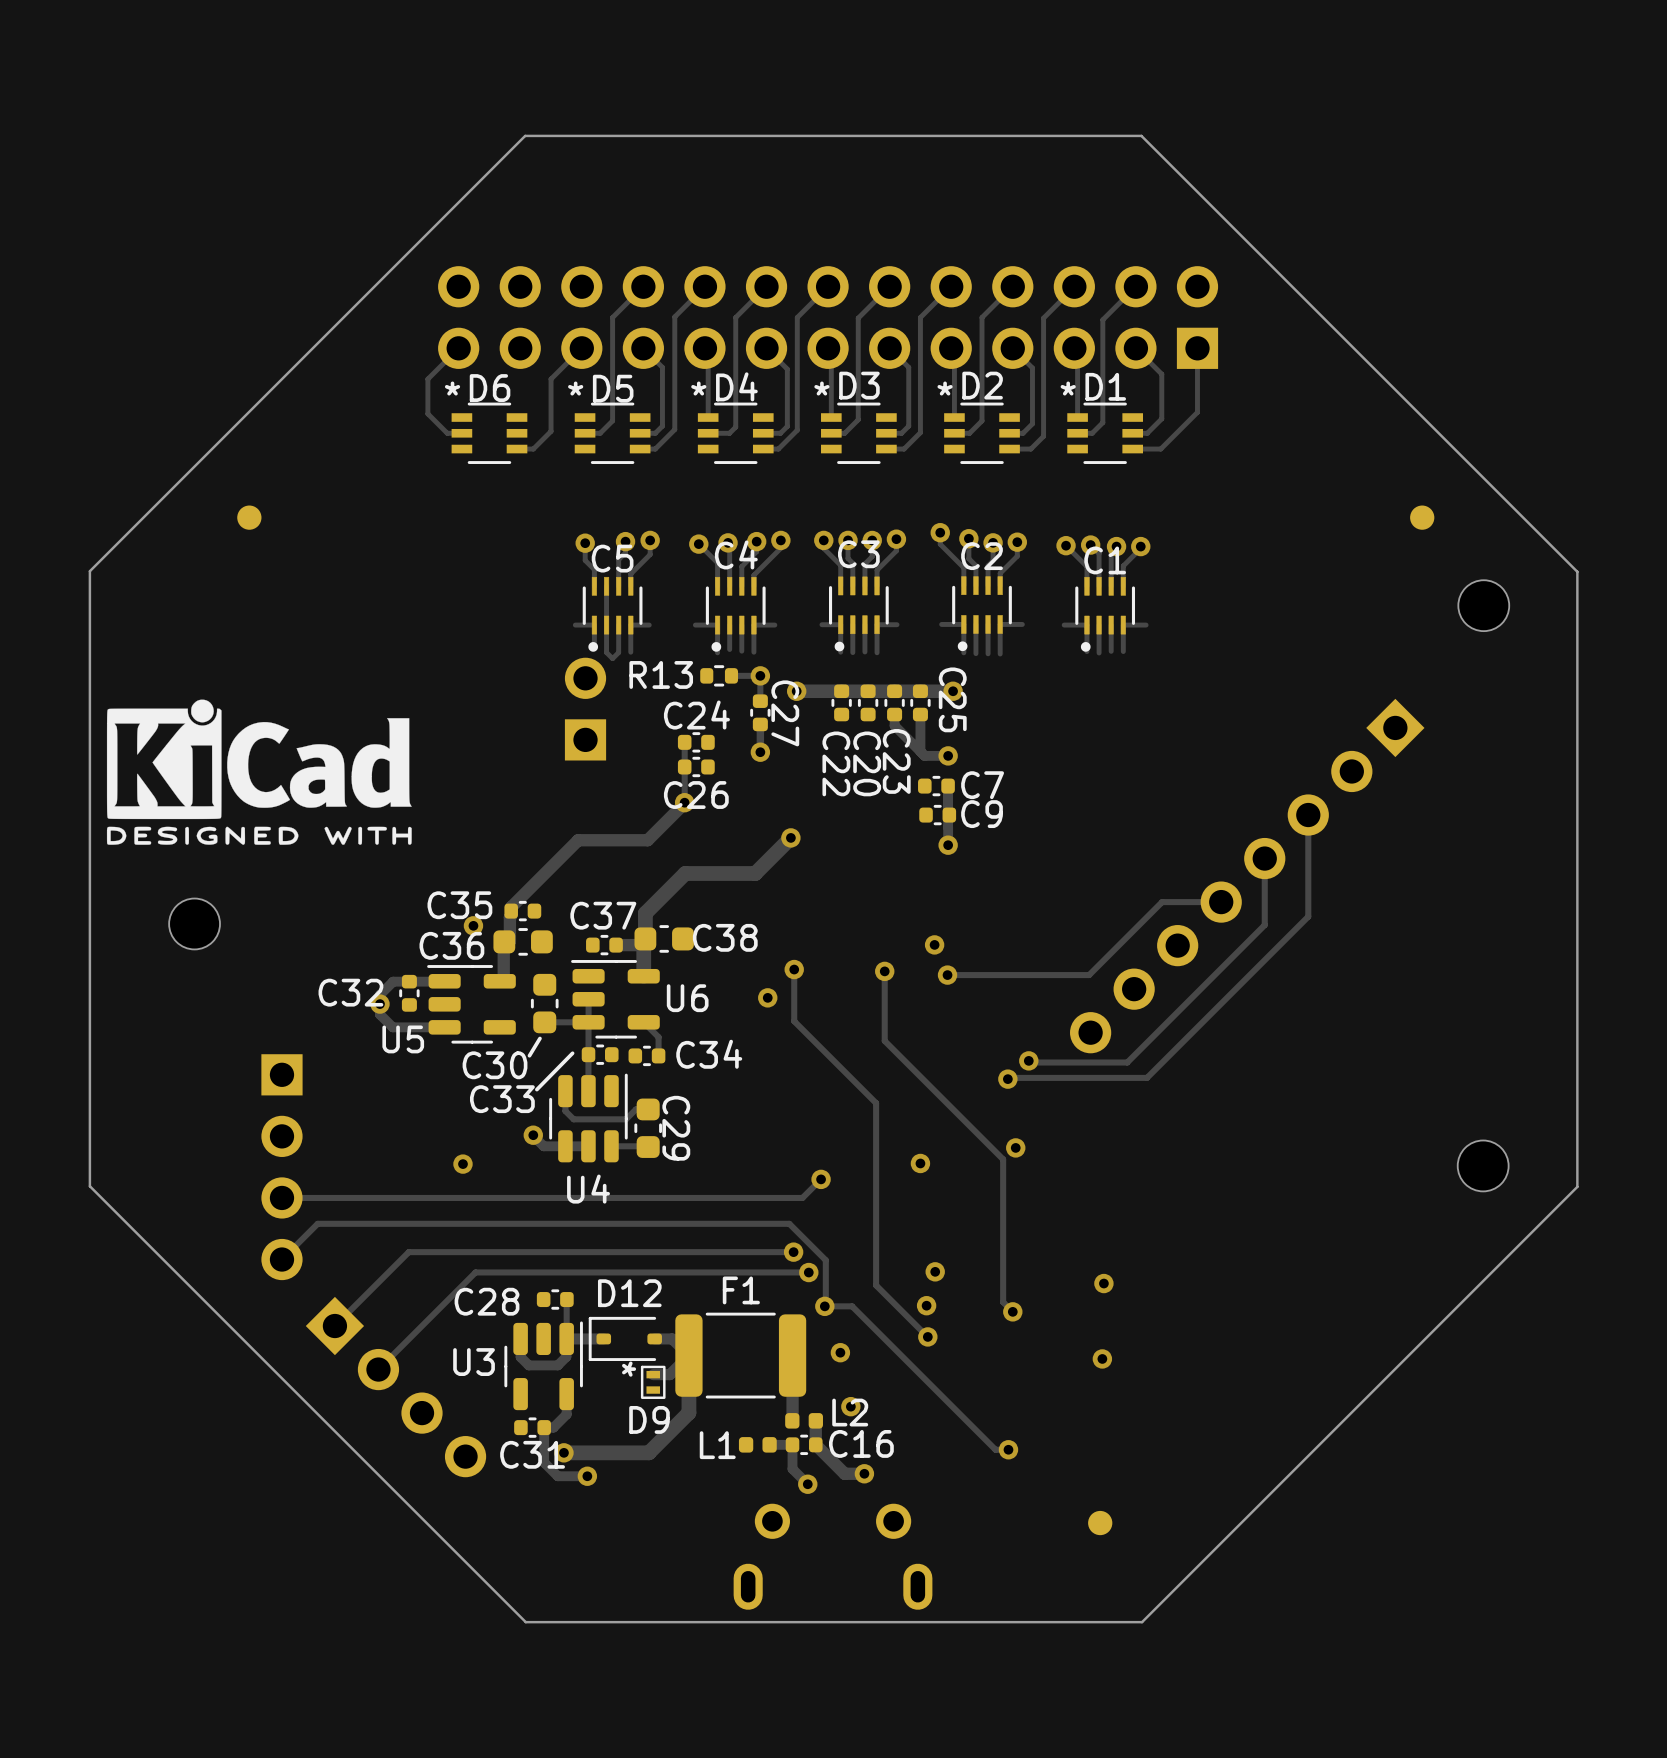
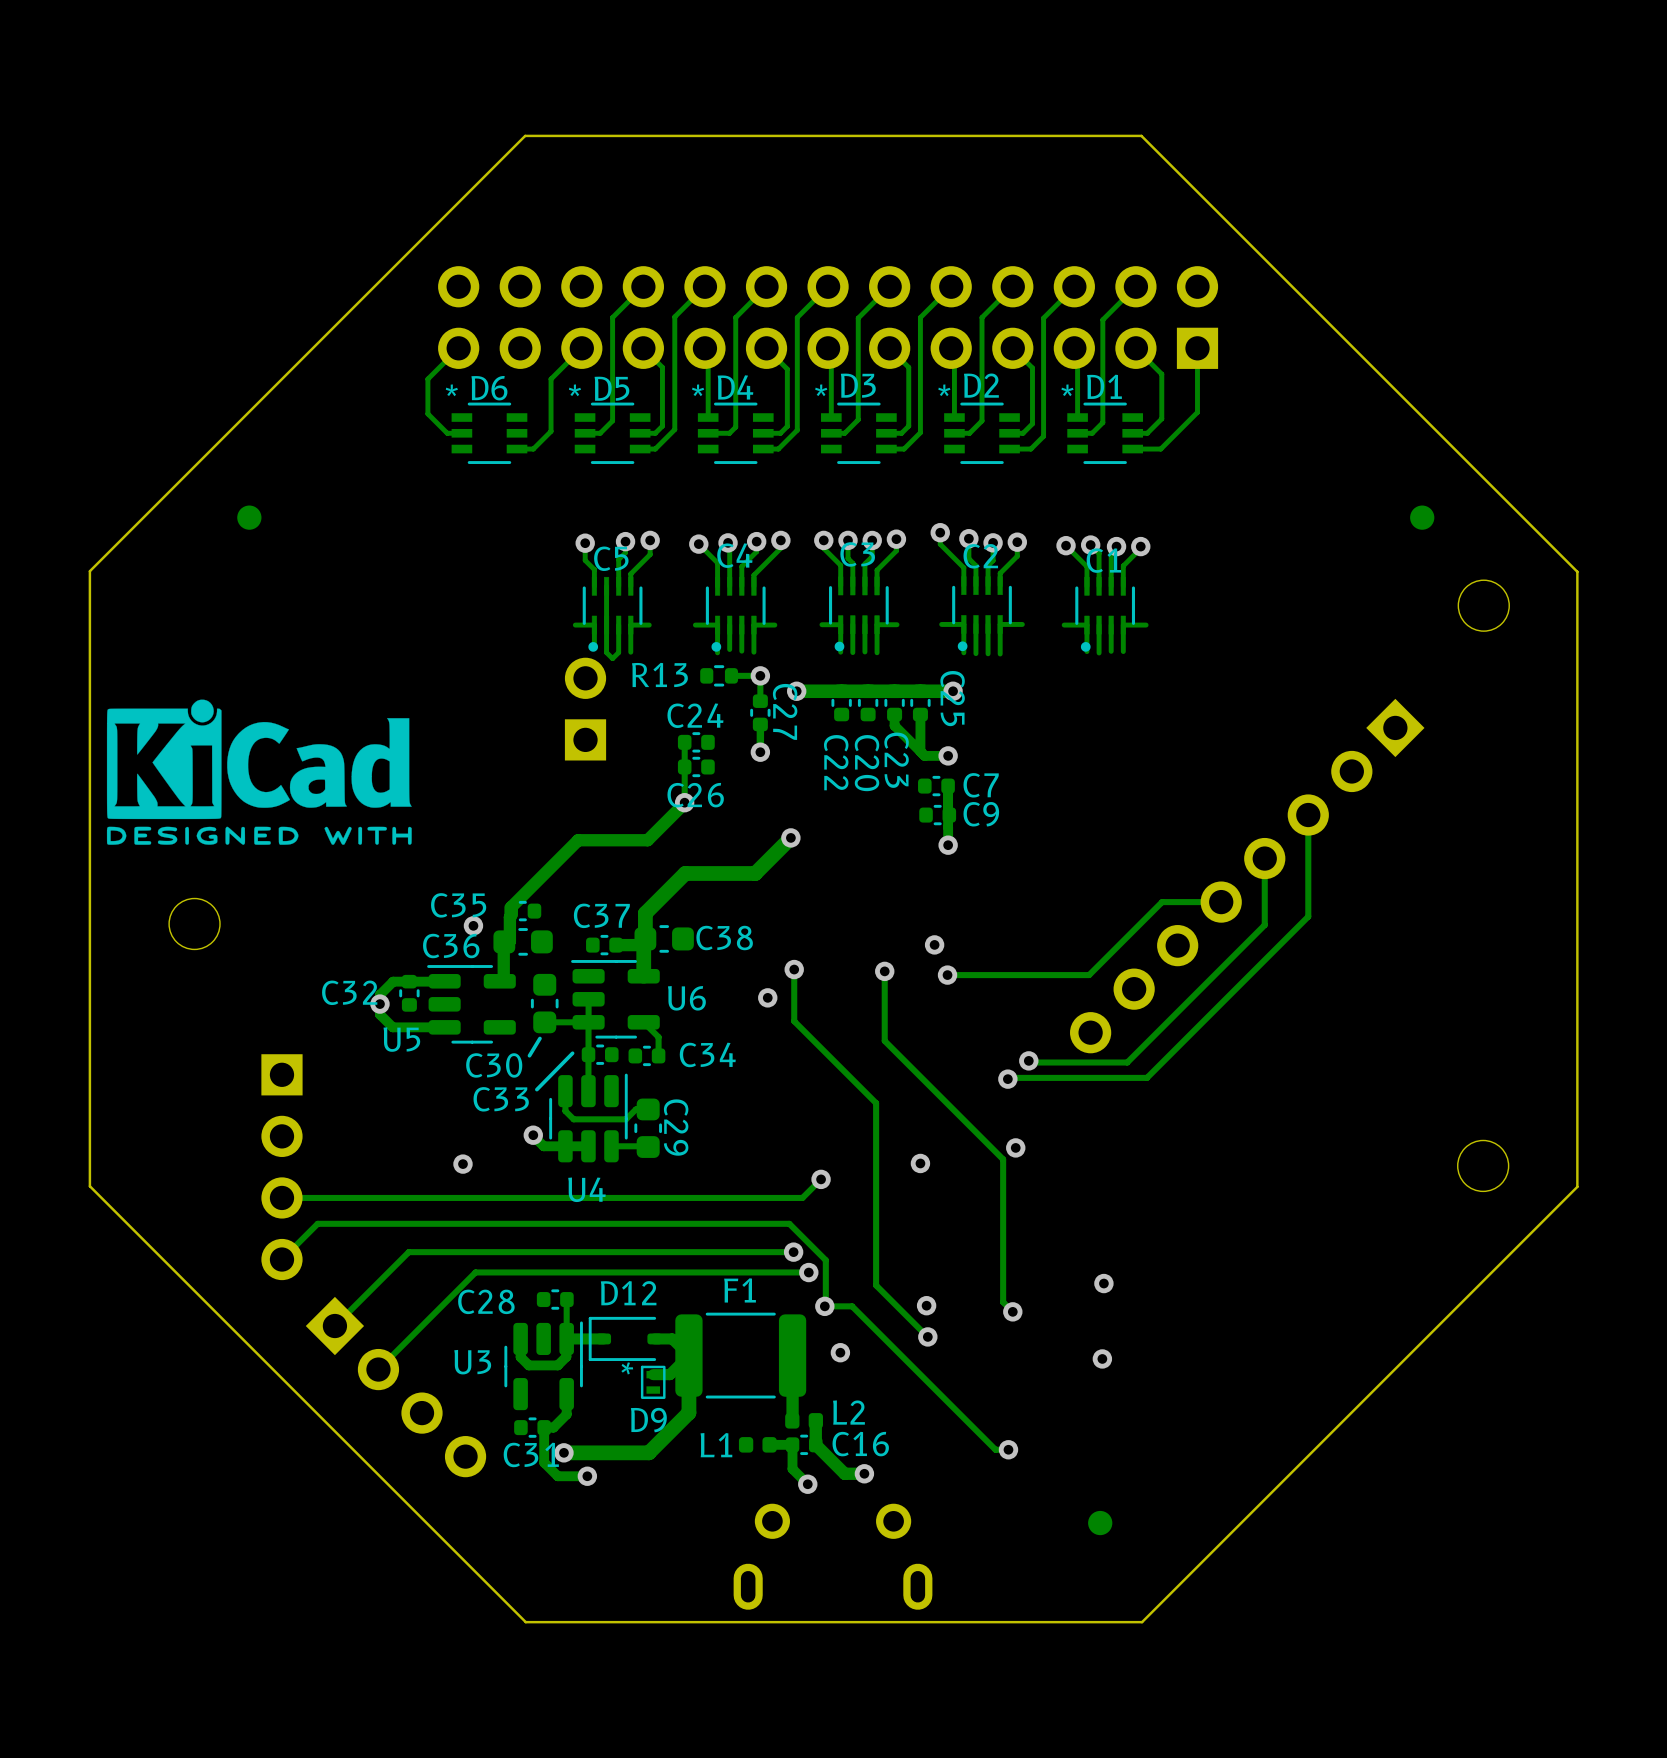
via: (935, 1271) -> none
via: (850, 1406) -> none

